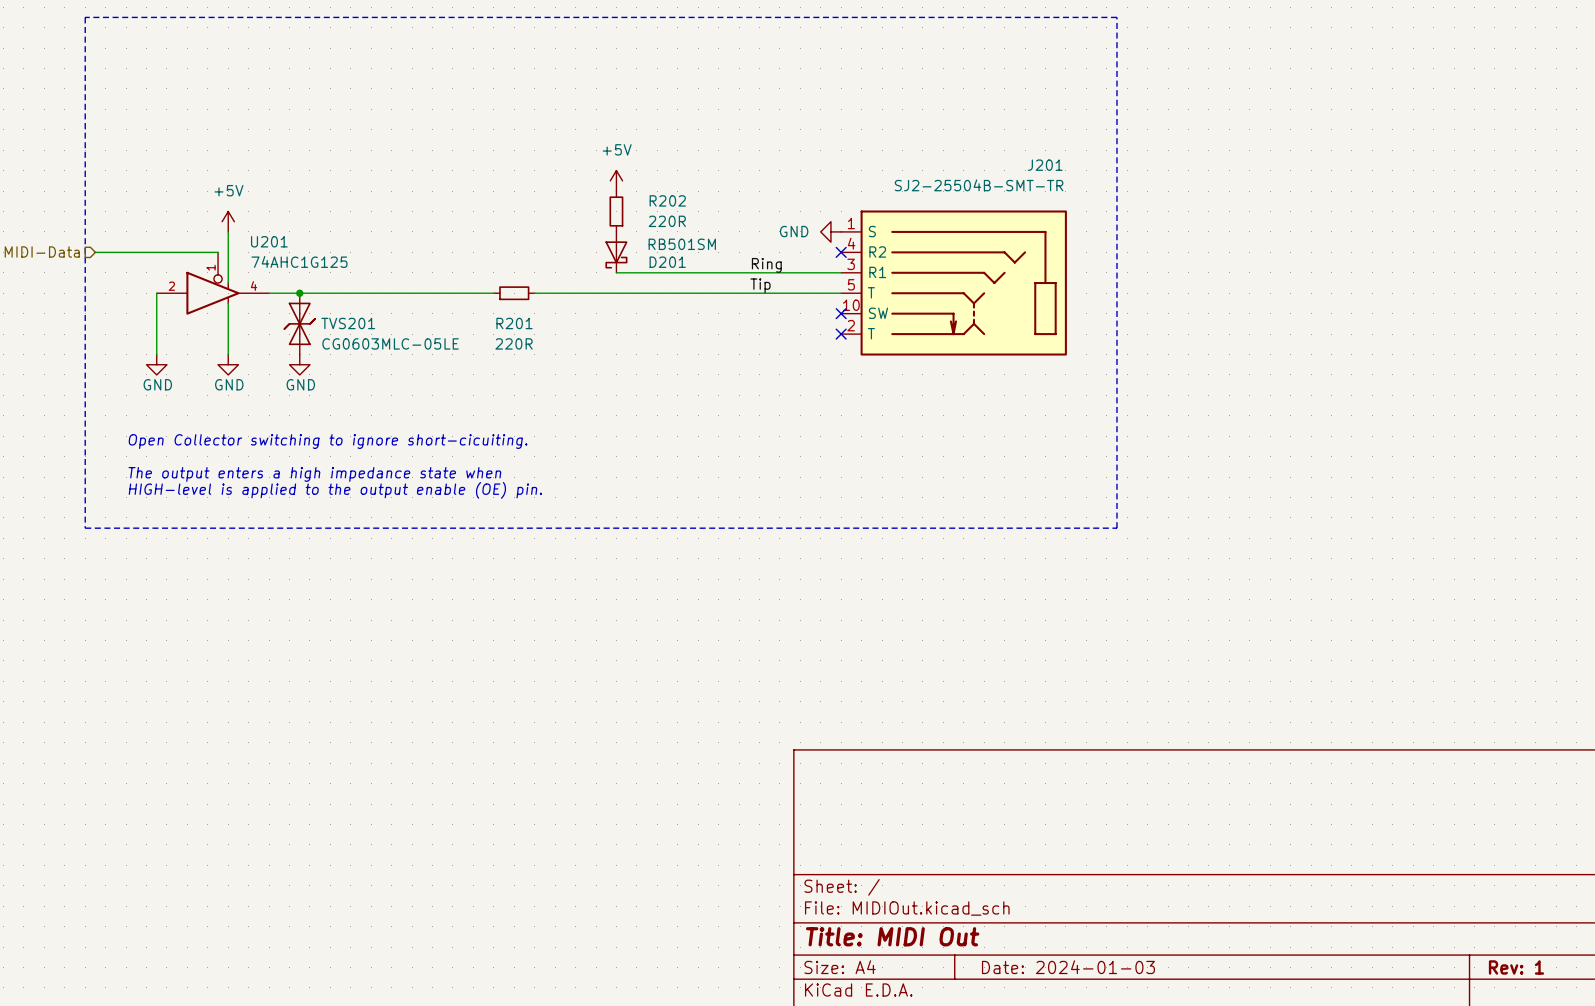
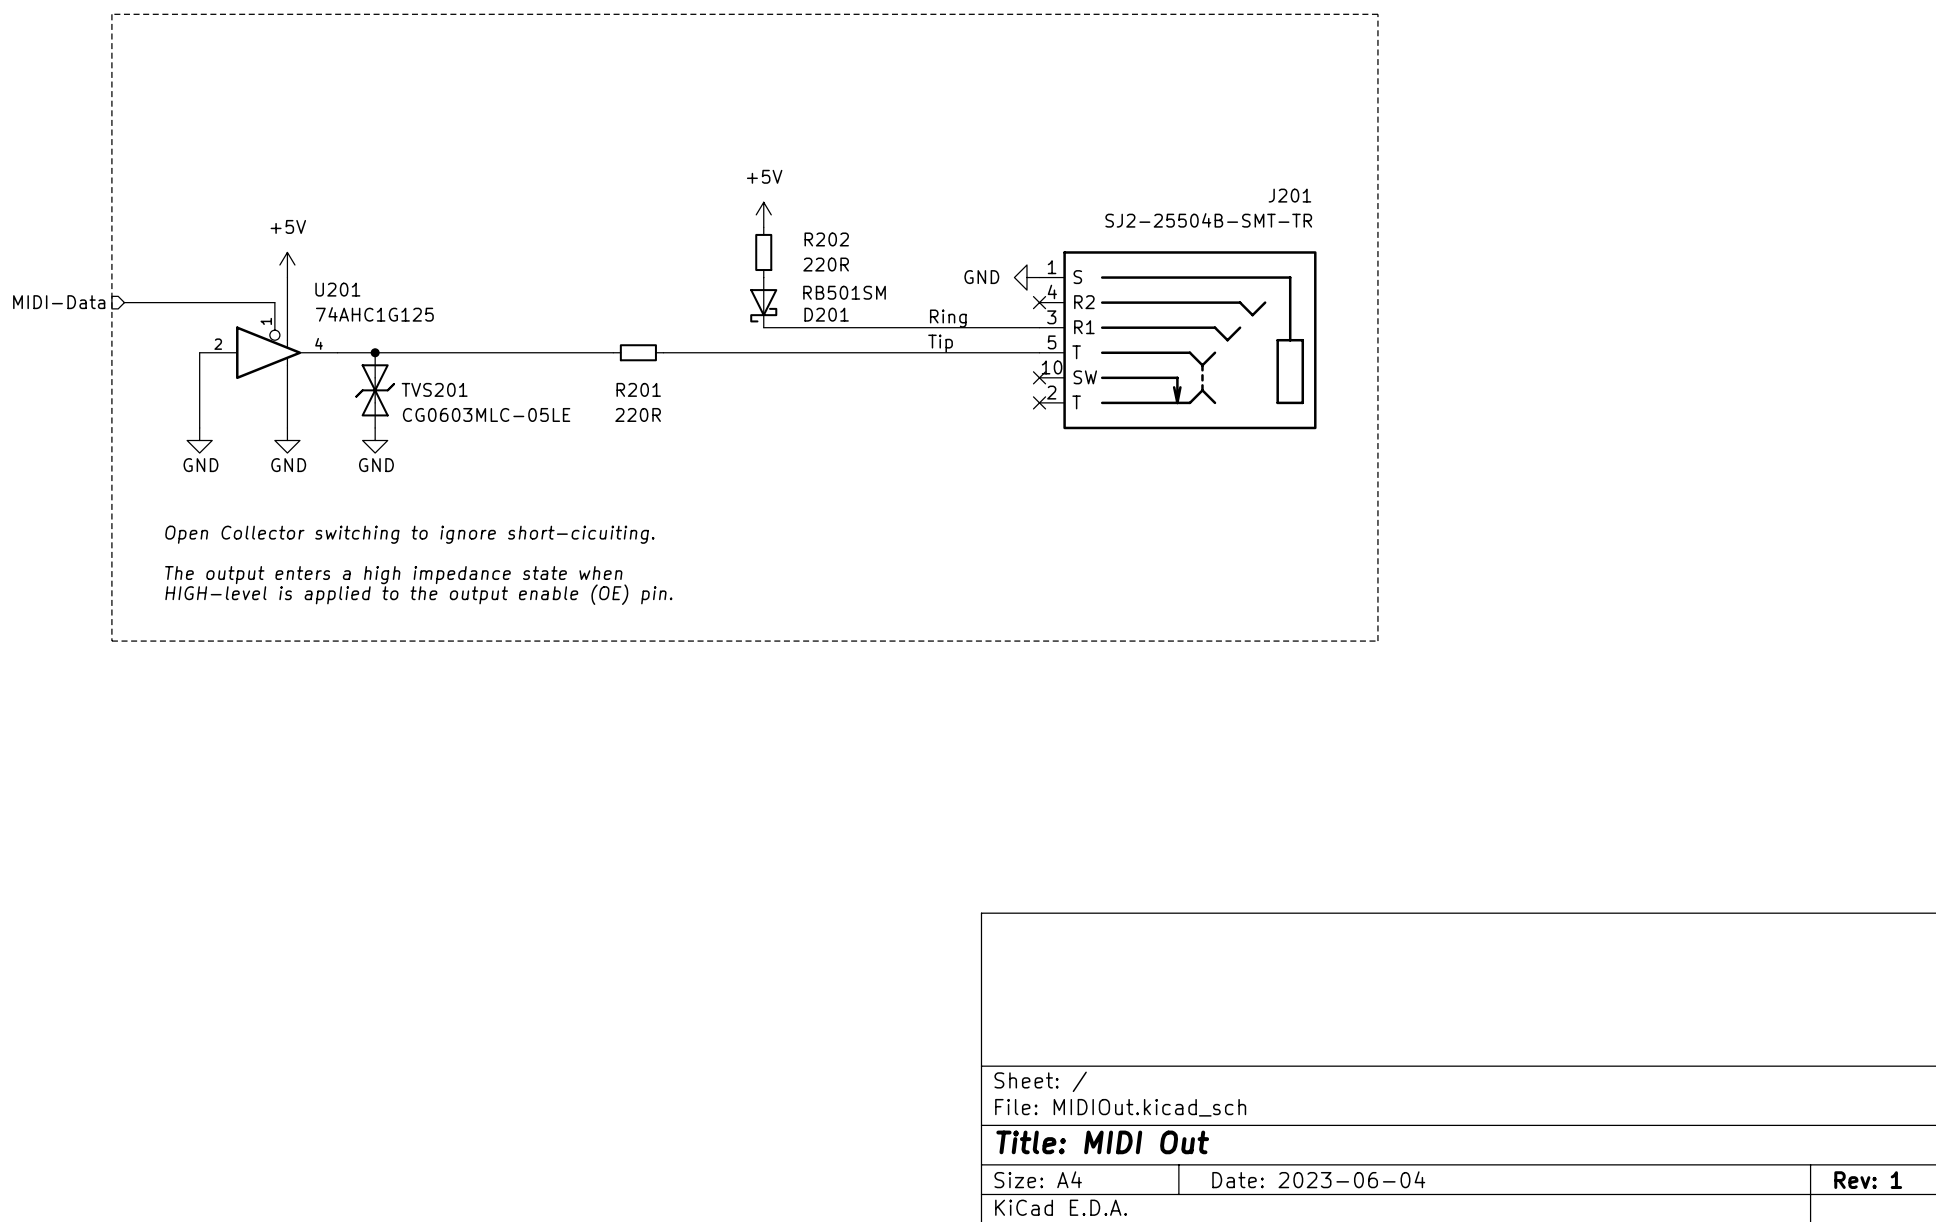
title block: Date: 2024-01-03 (1068, 967) -> Date: 2023-06-04 (1318, 1179)

